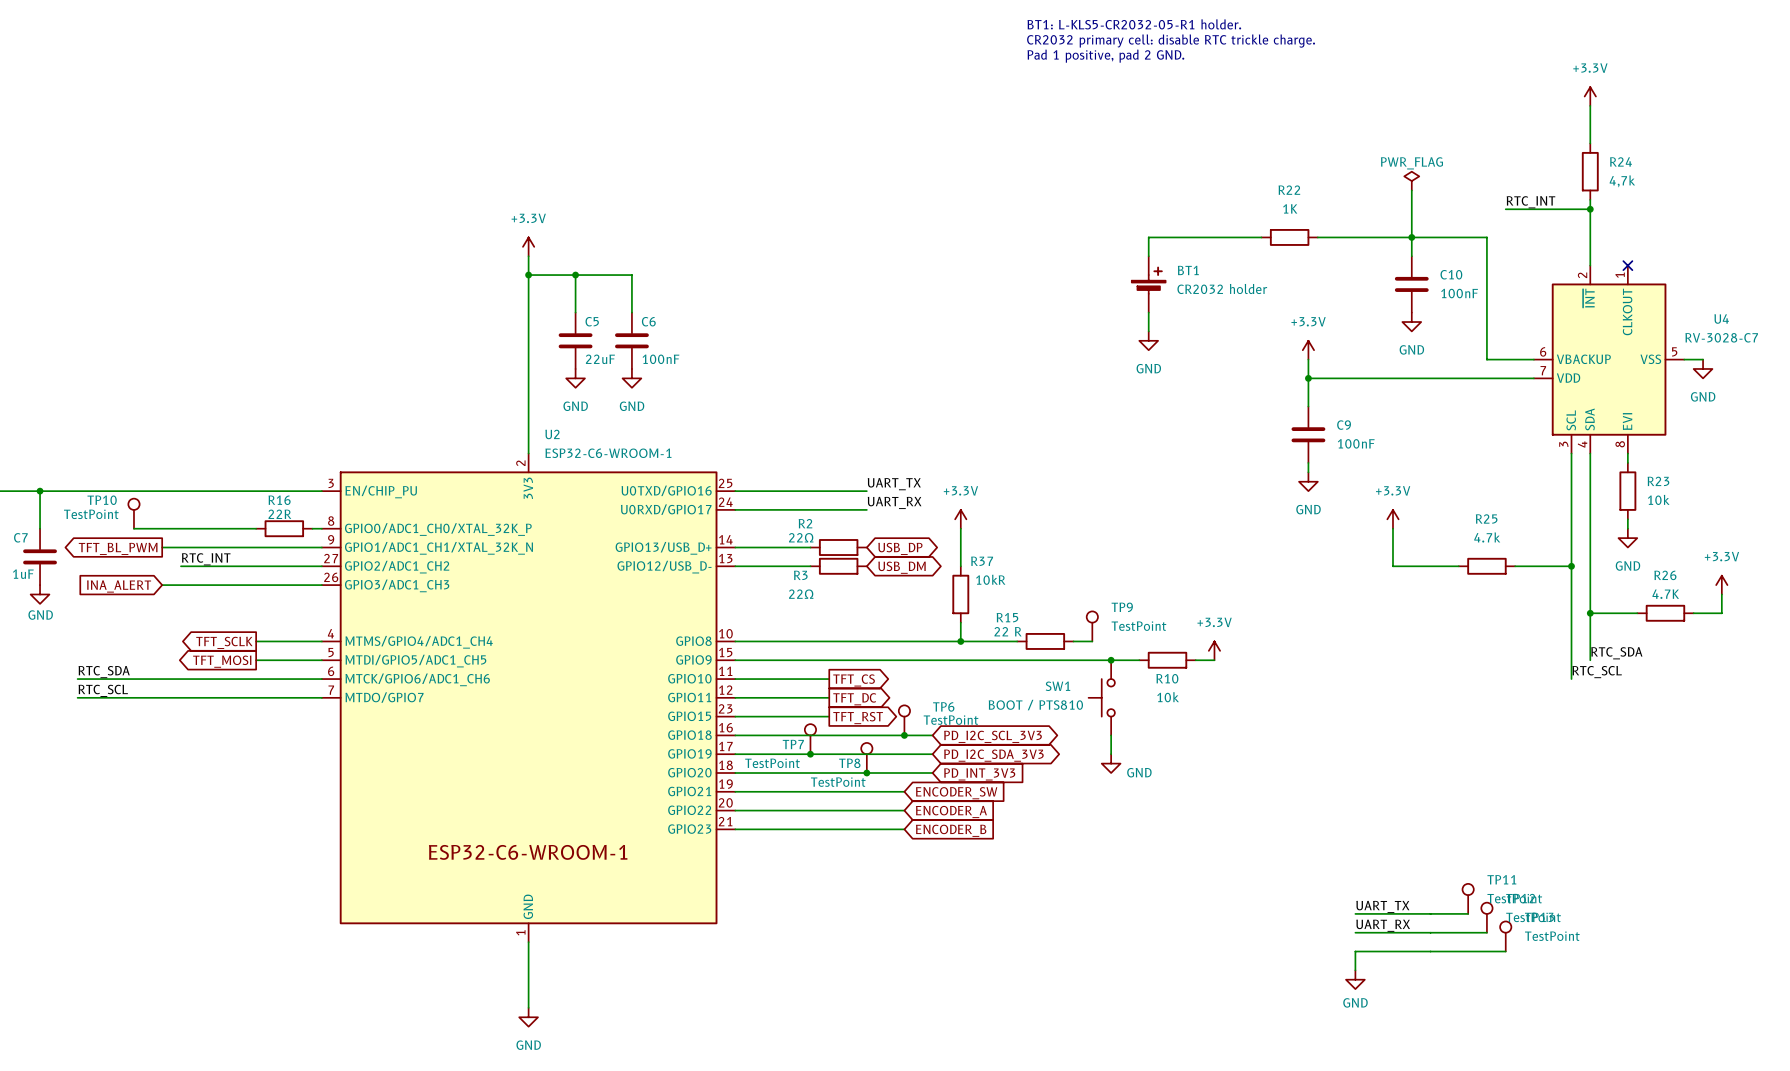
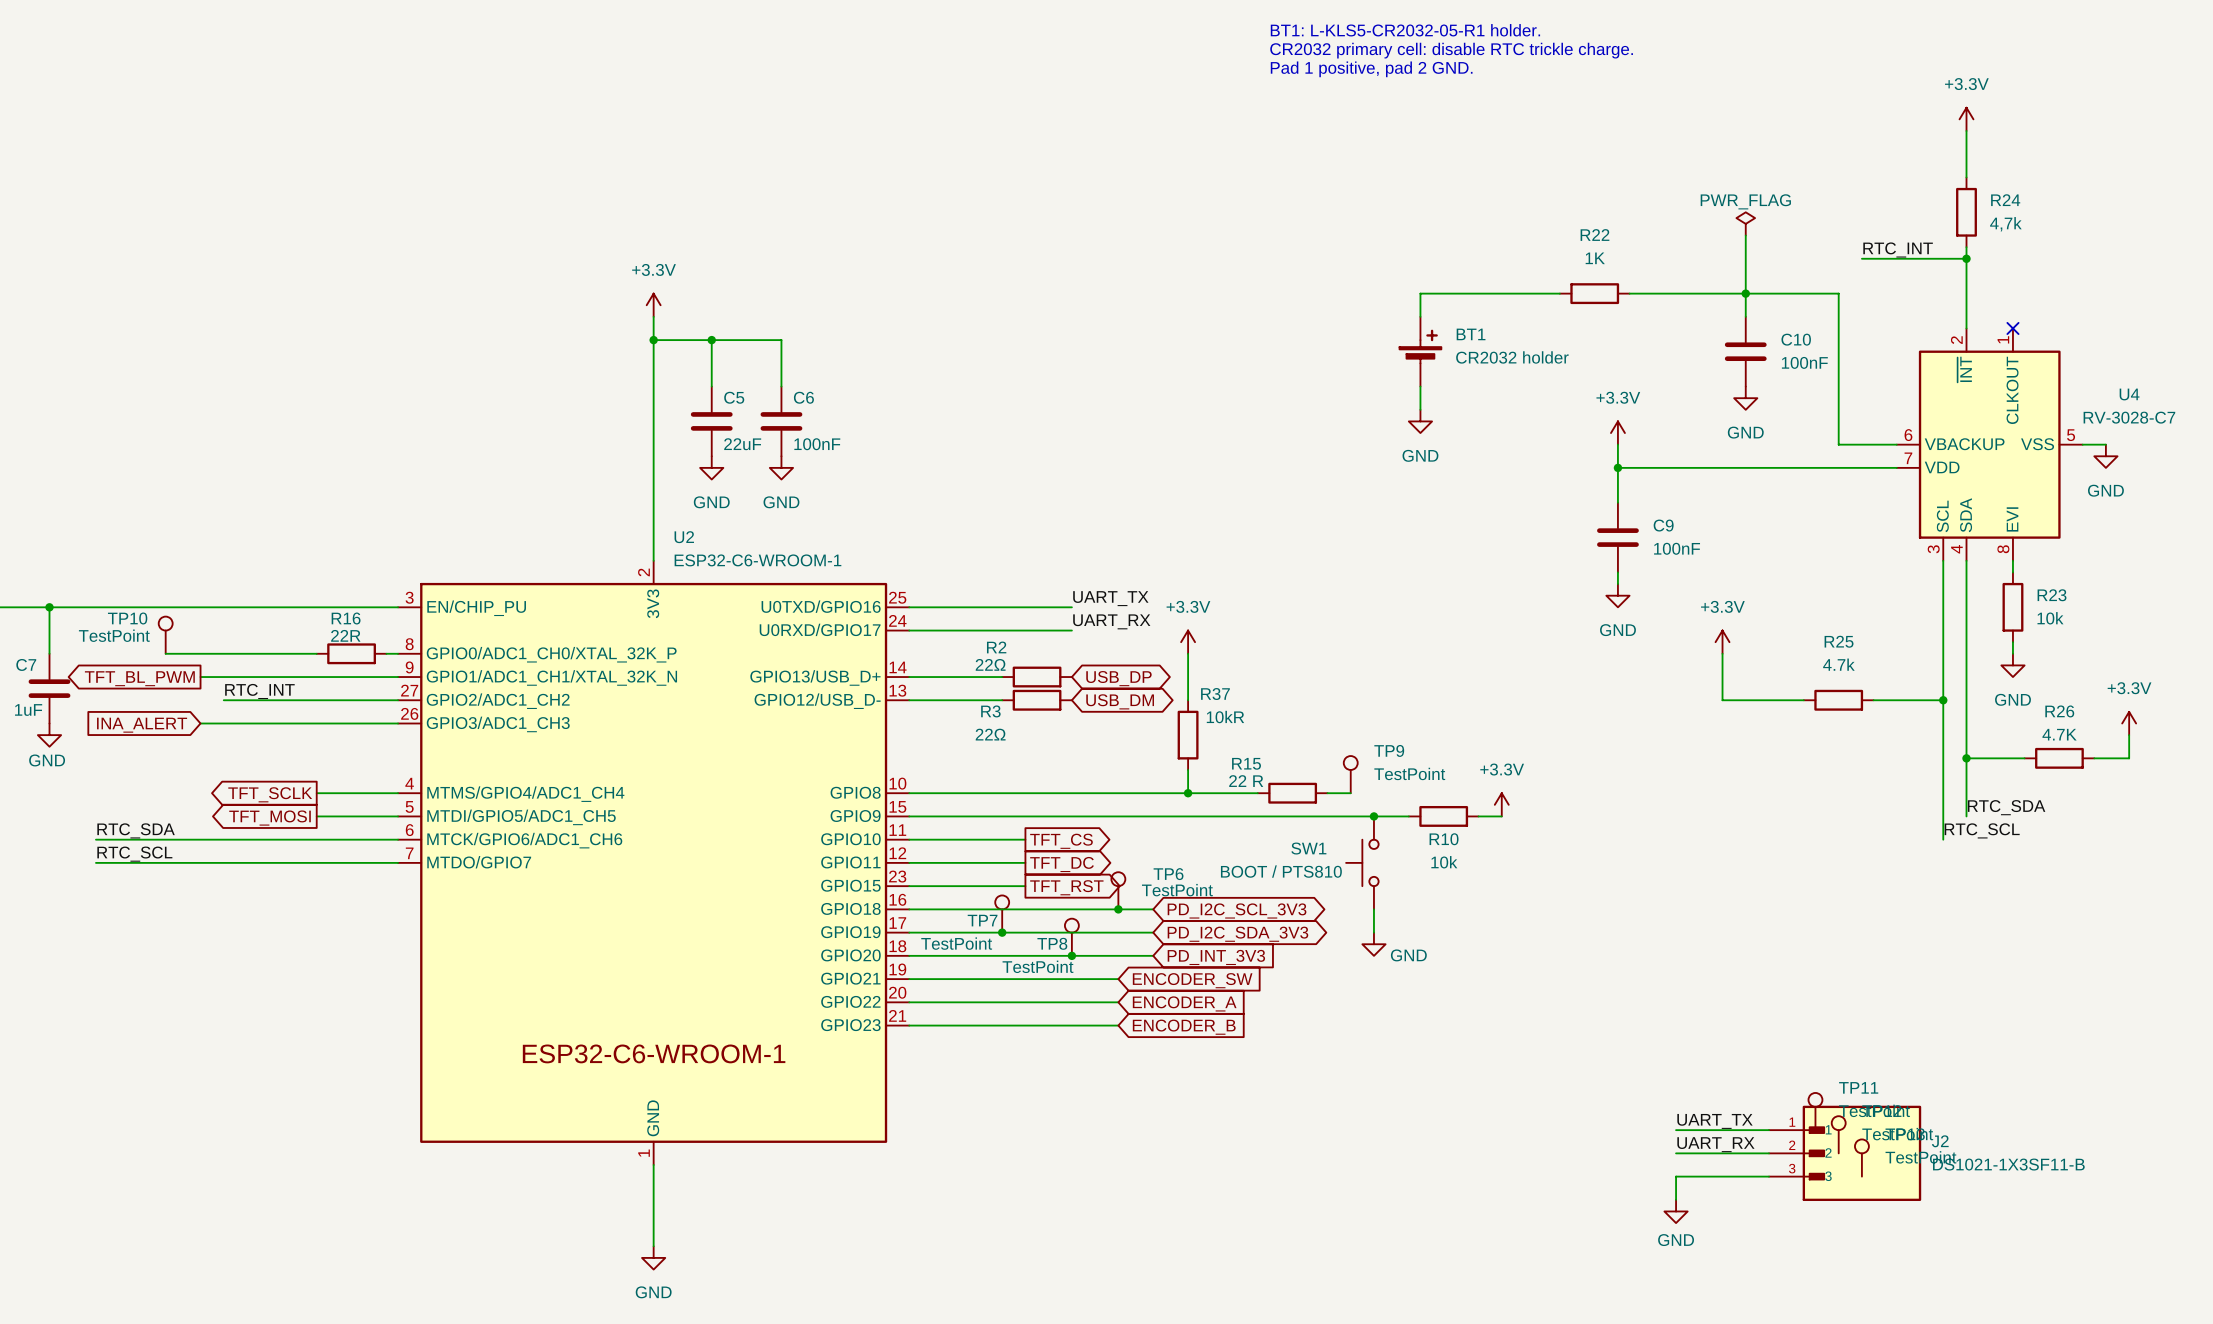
J2: none -> DS1021-1X3SF11-B (1845, 1153)

